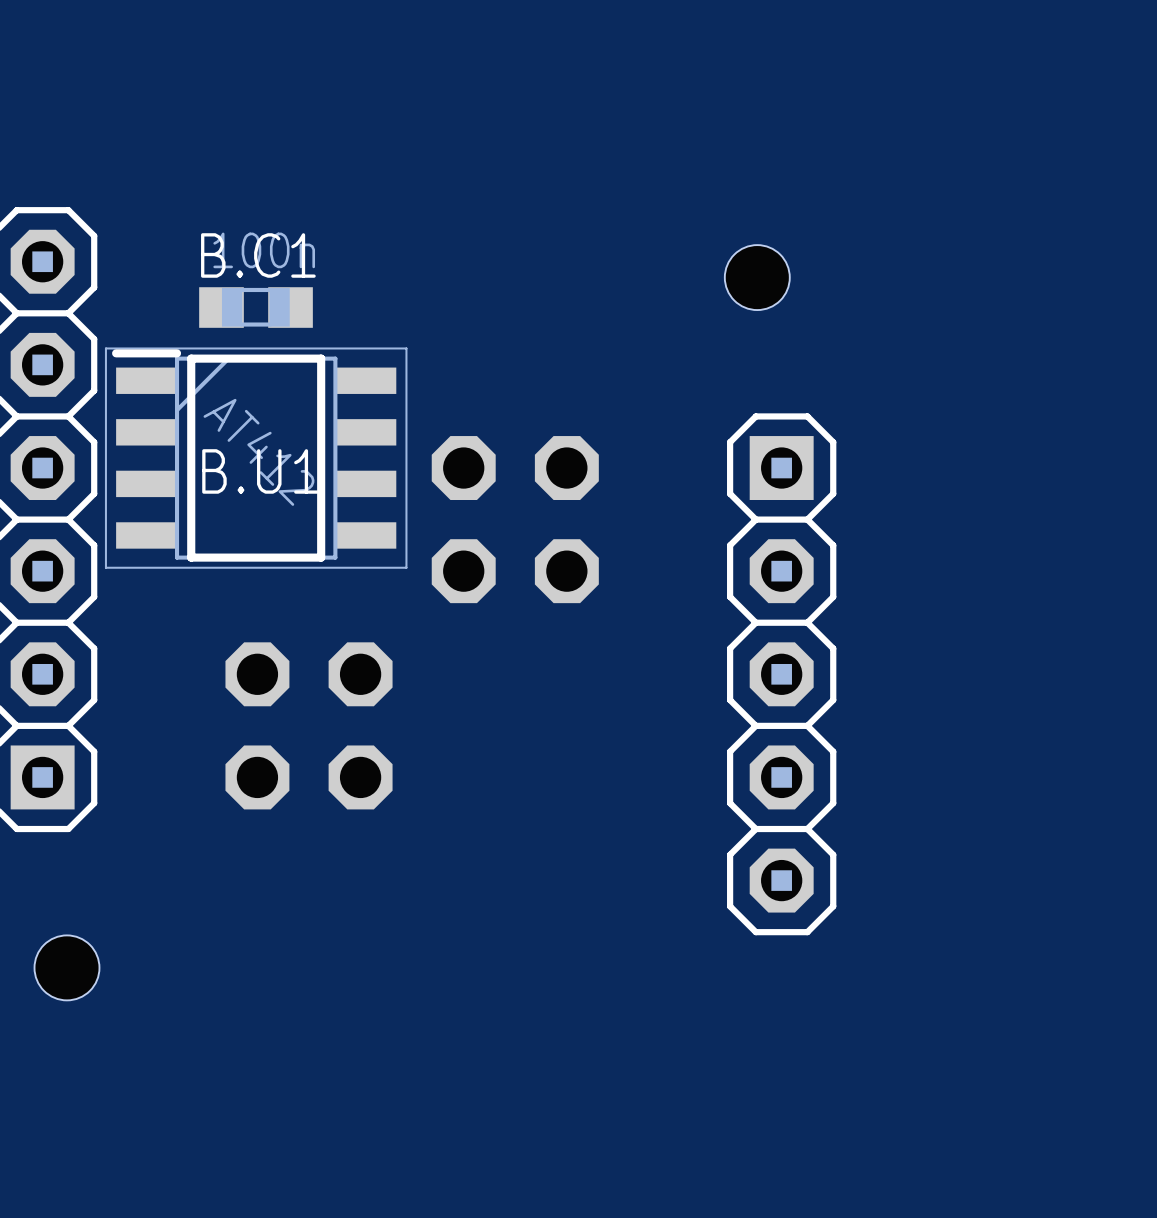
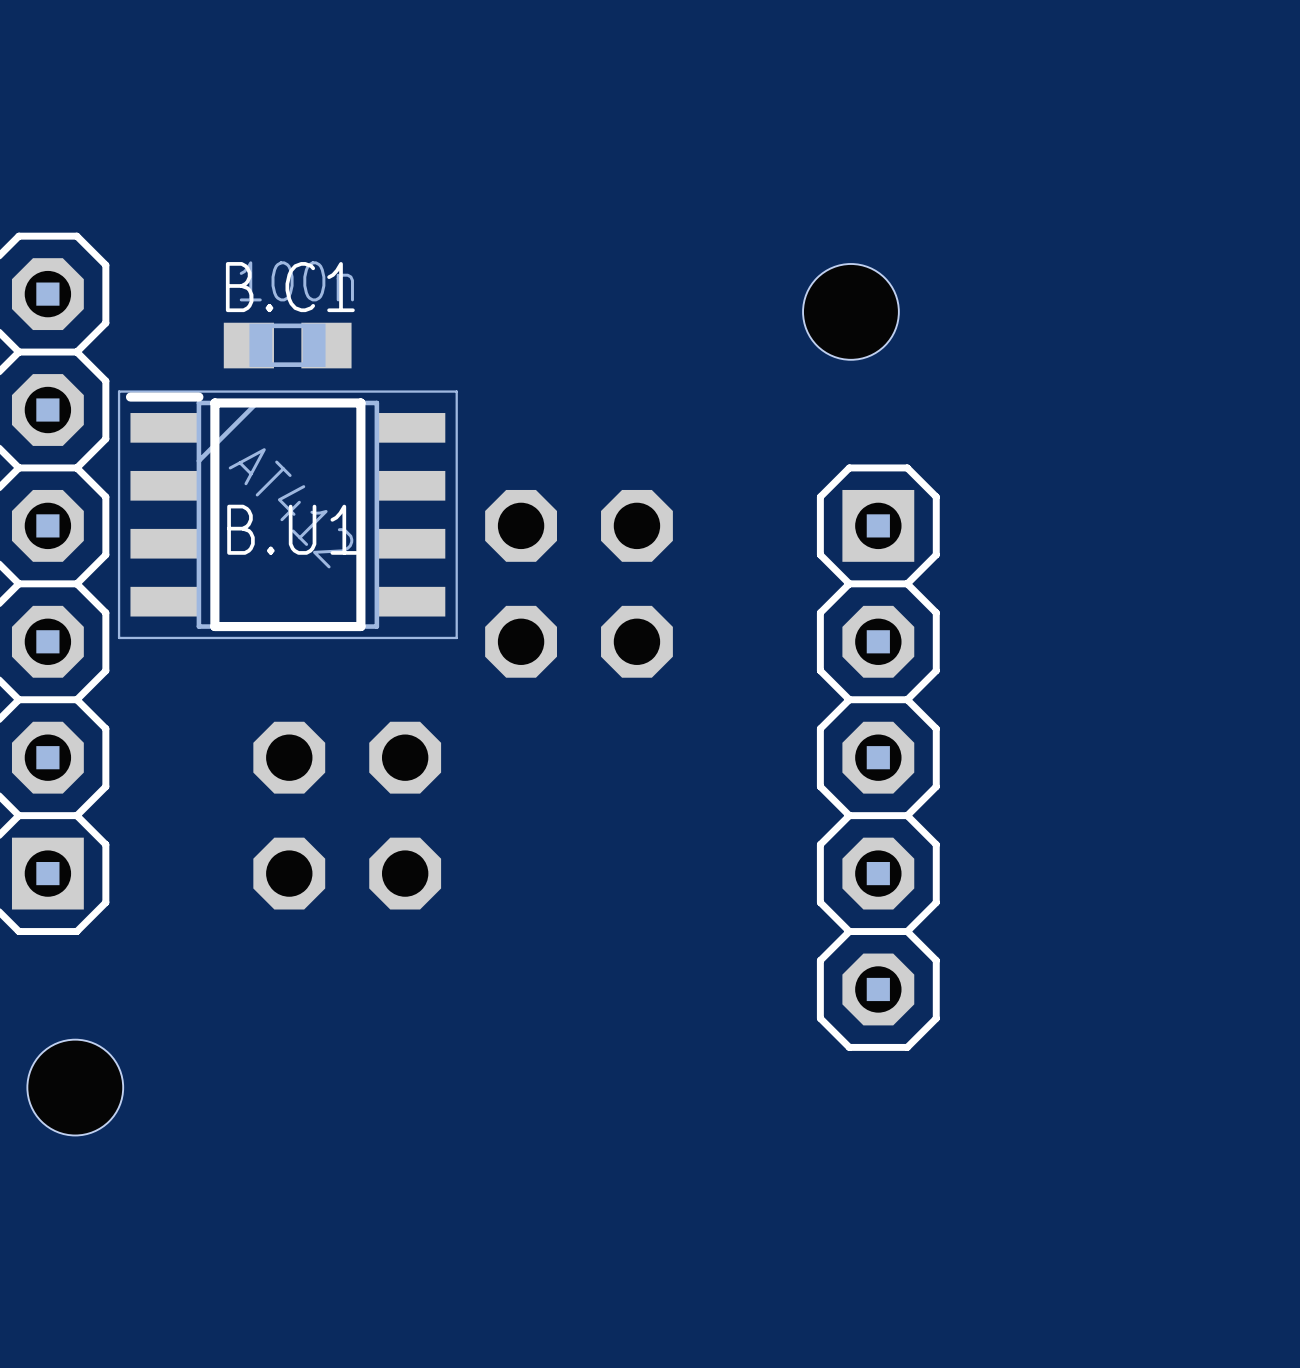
hole size: [724, 245, 790, 311] -> [803, 263, 899, 360]
hole size: [34, 935, 100, 1001] -> [27, 1039, 124, 1136]

